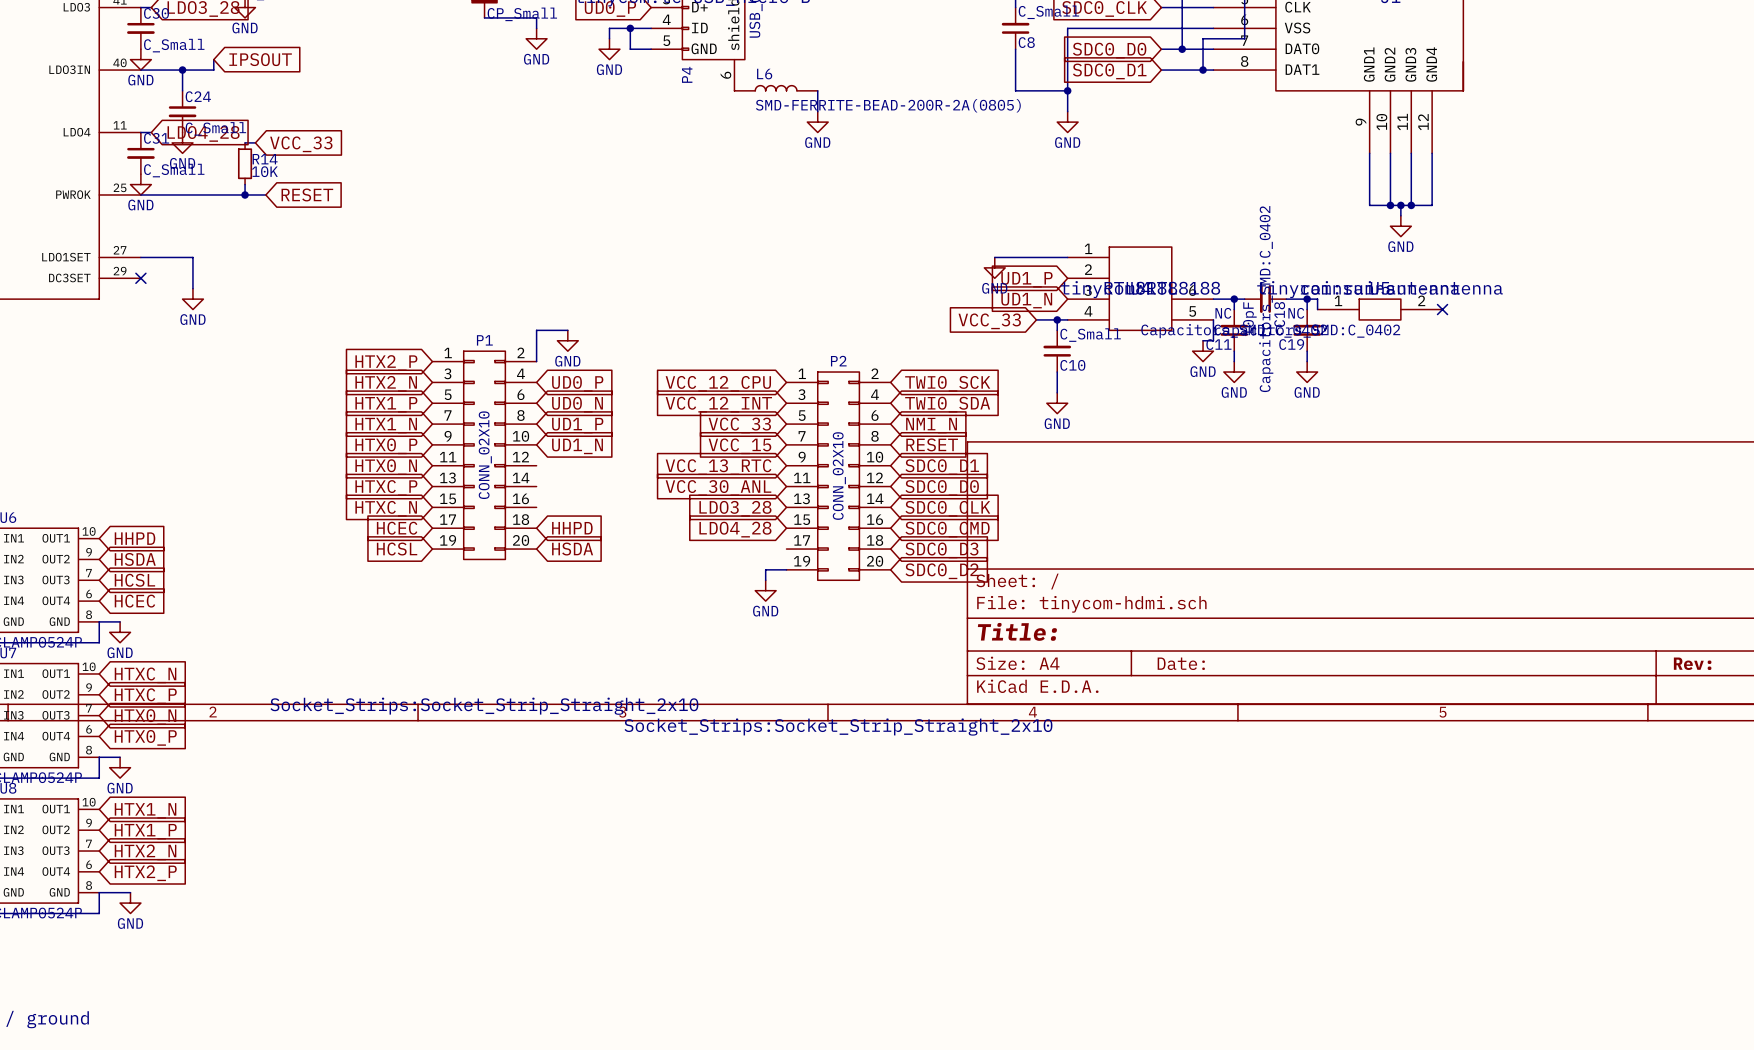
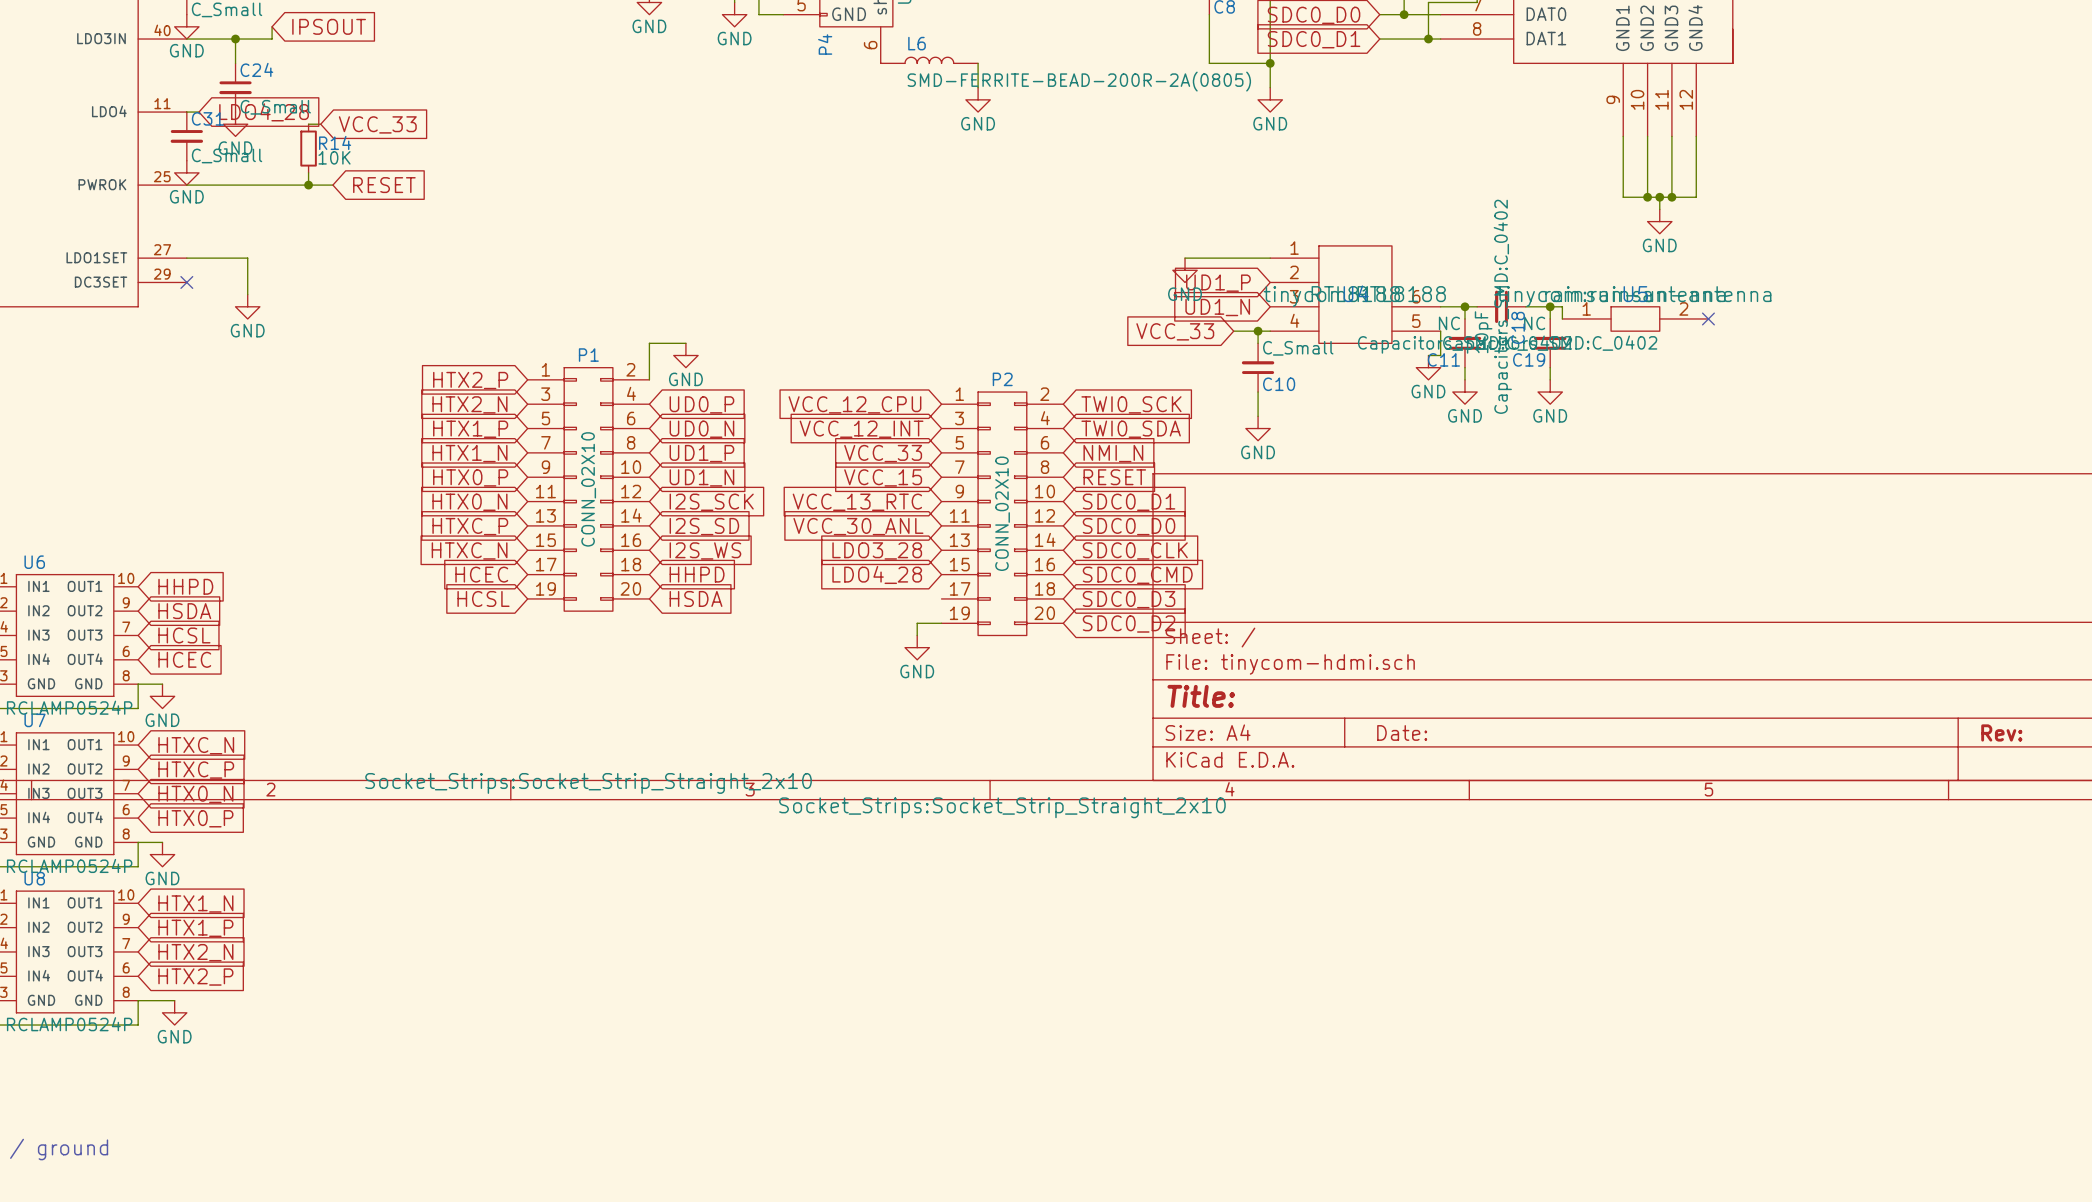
global label: none -> I2S_SCK (711, 502)
global label: none -> I2S_SD (704, 526)
global label: none -> I2S_WS (705, 550)

